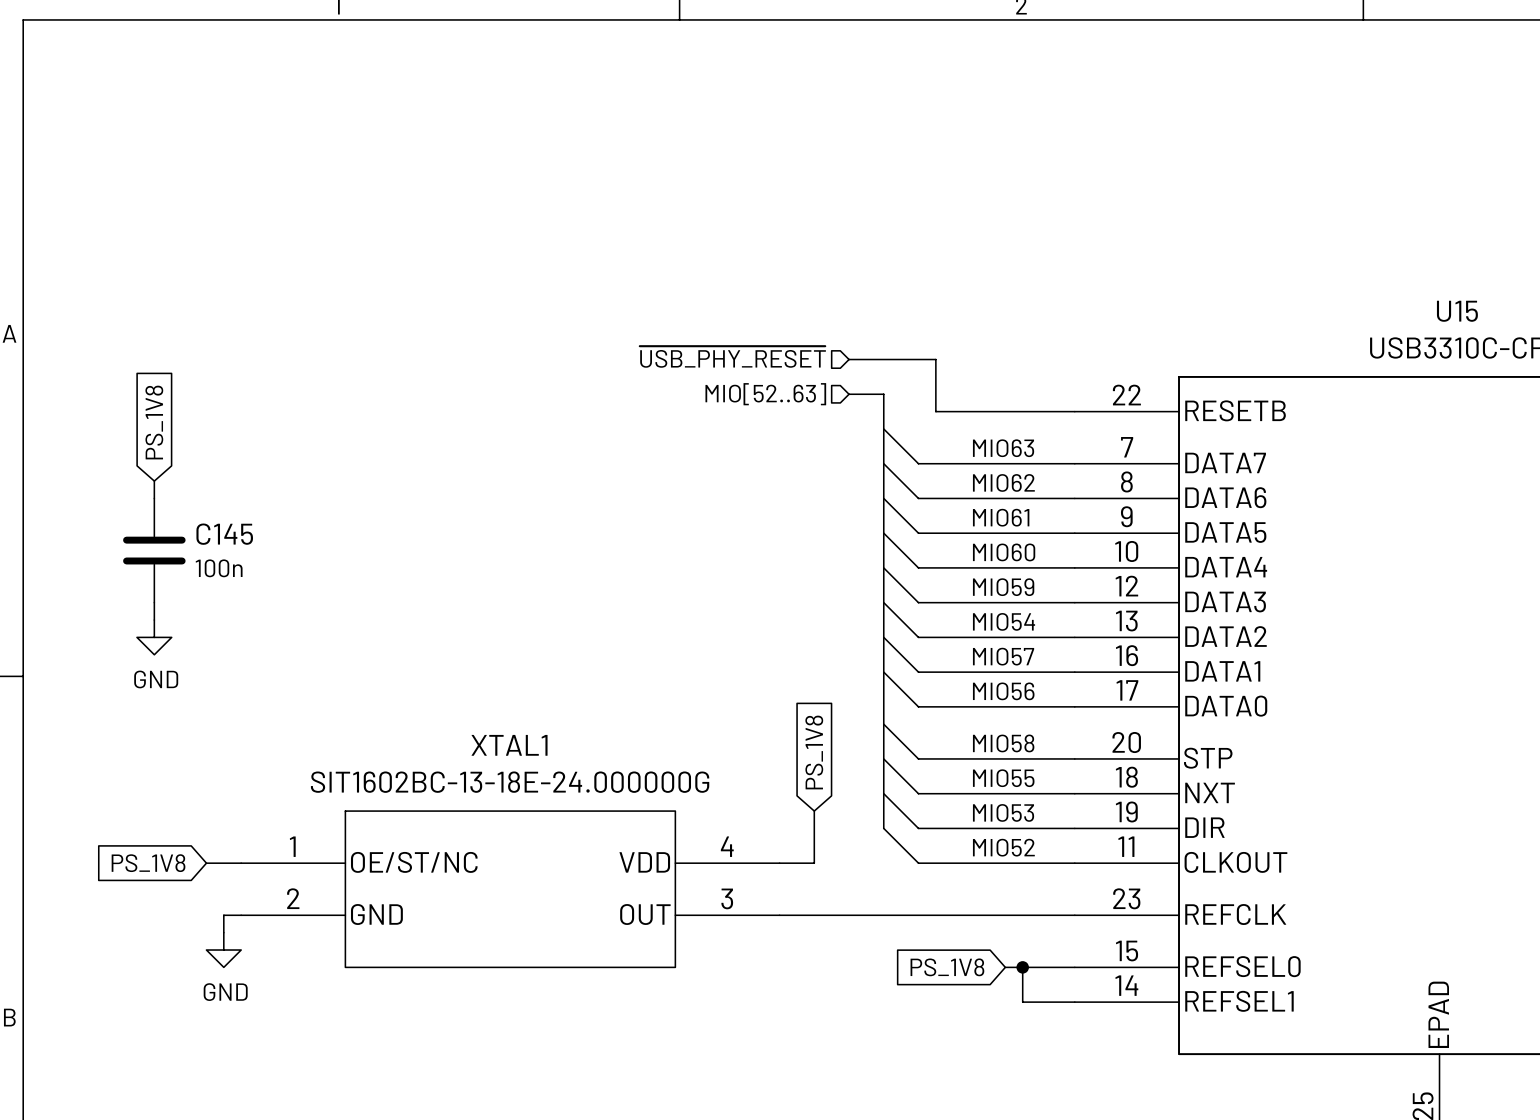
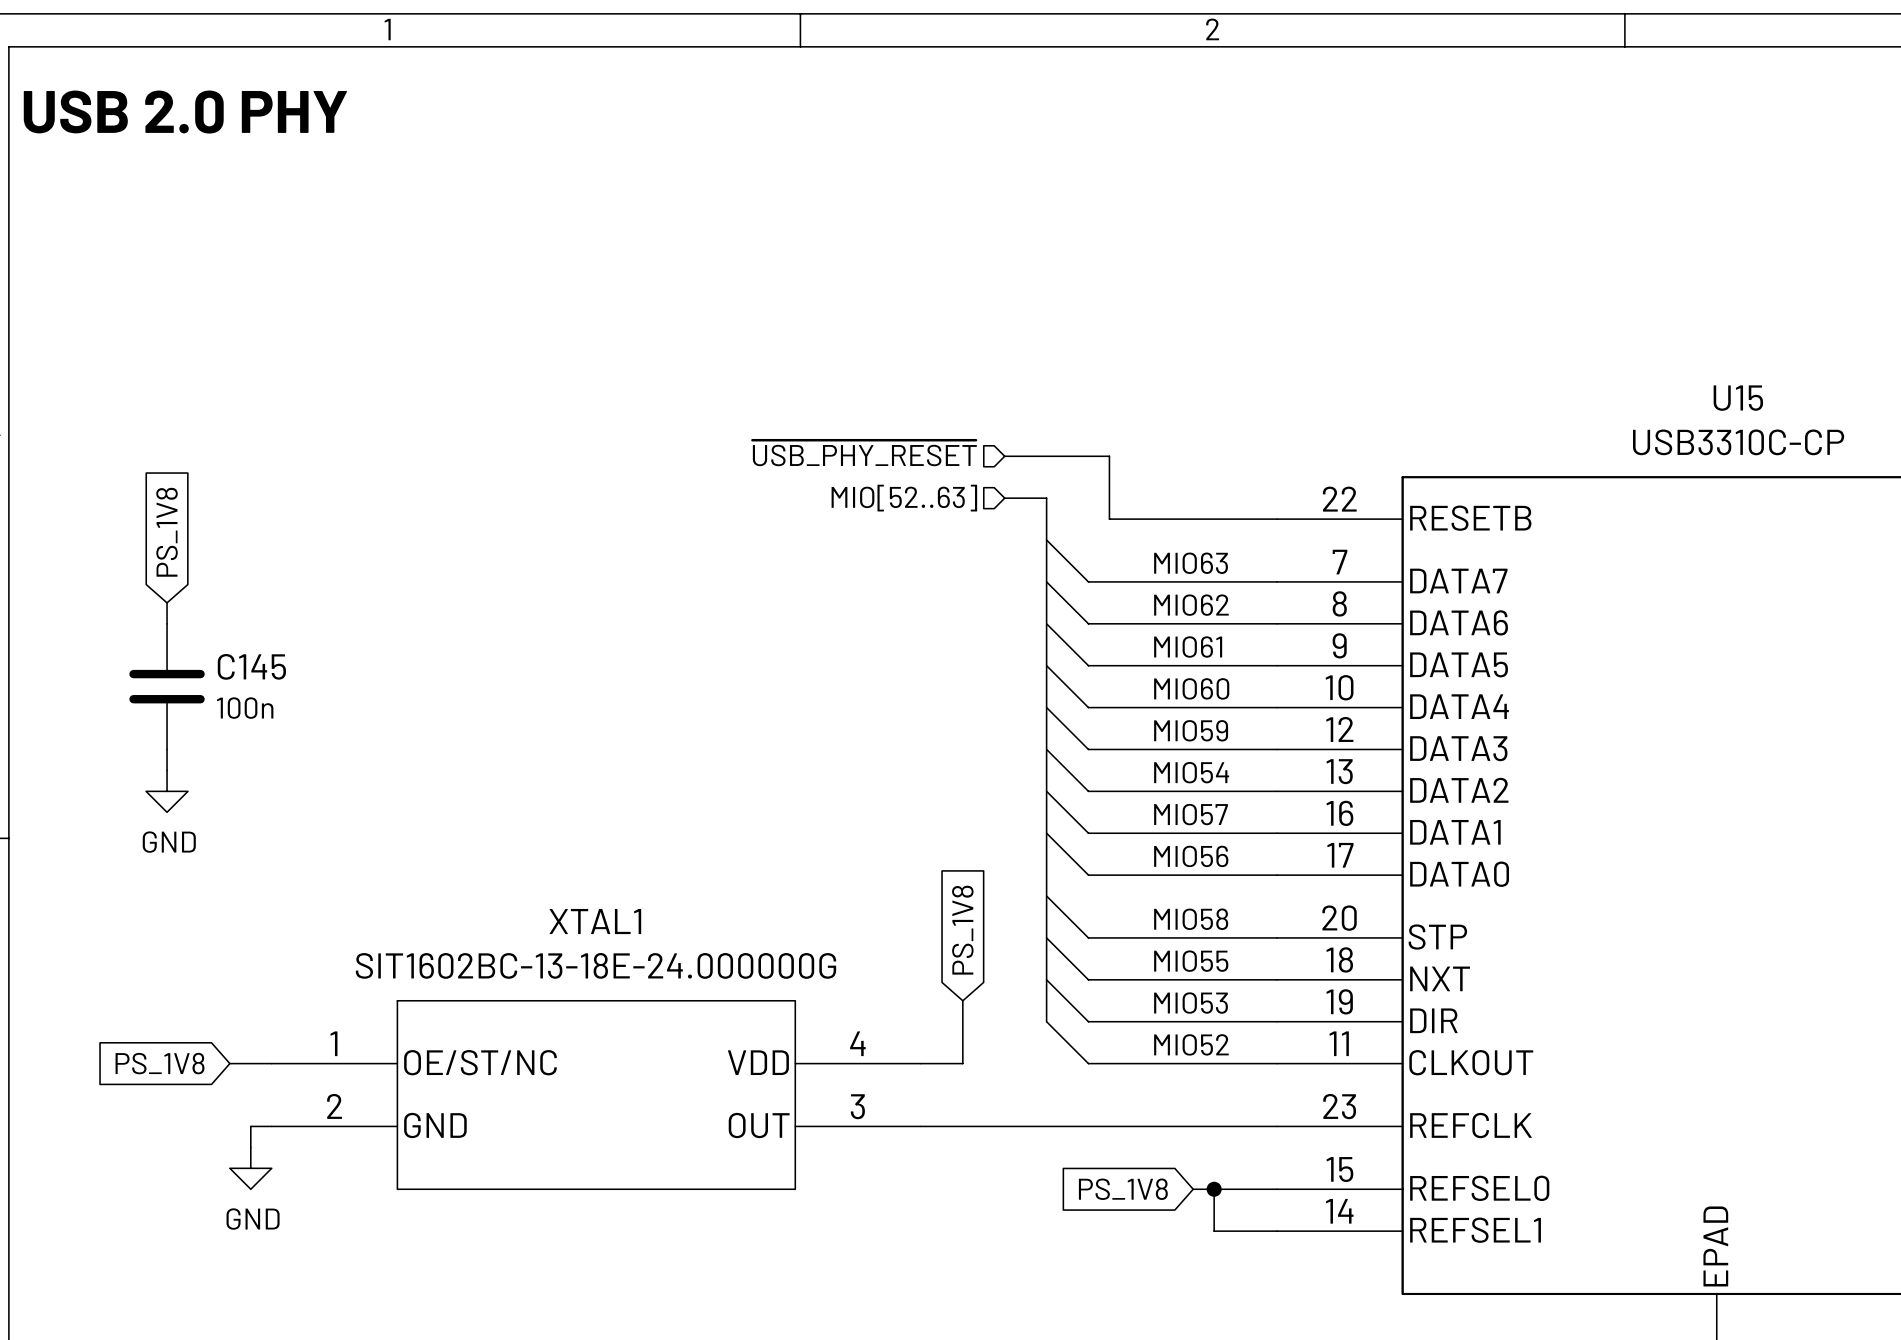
text: none -> USB 2.0 PHY (185, 112)

